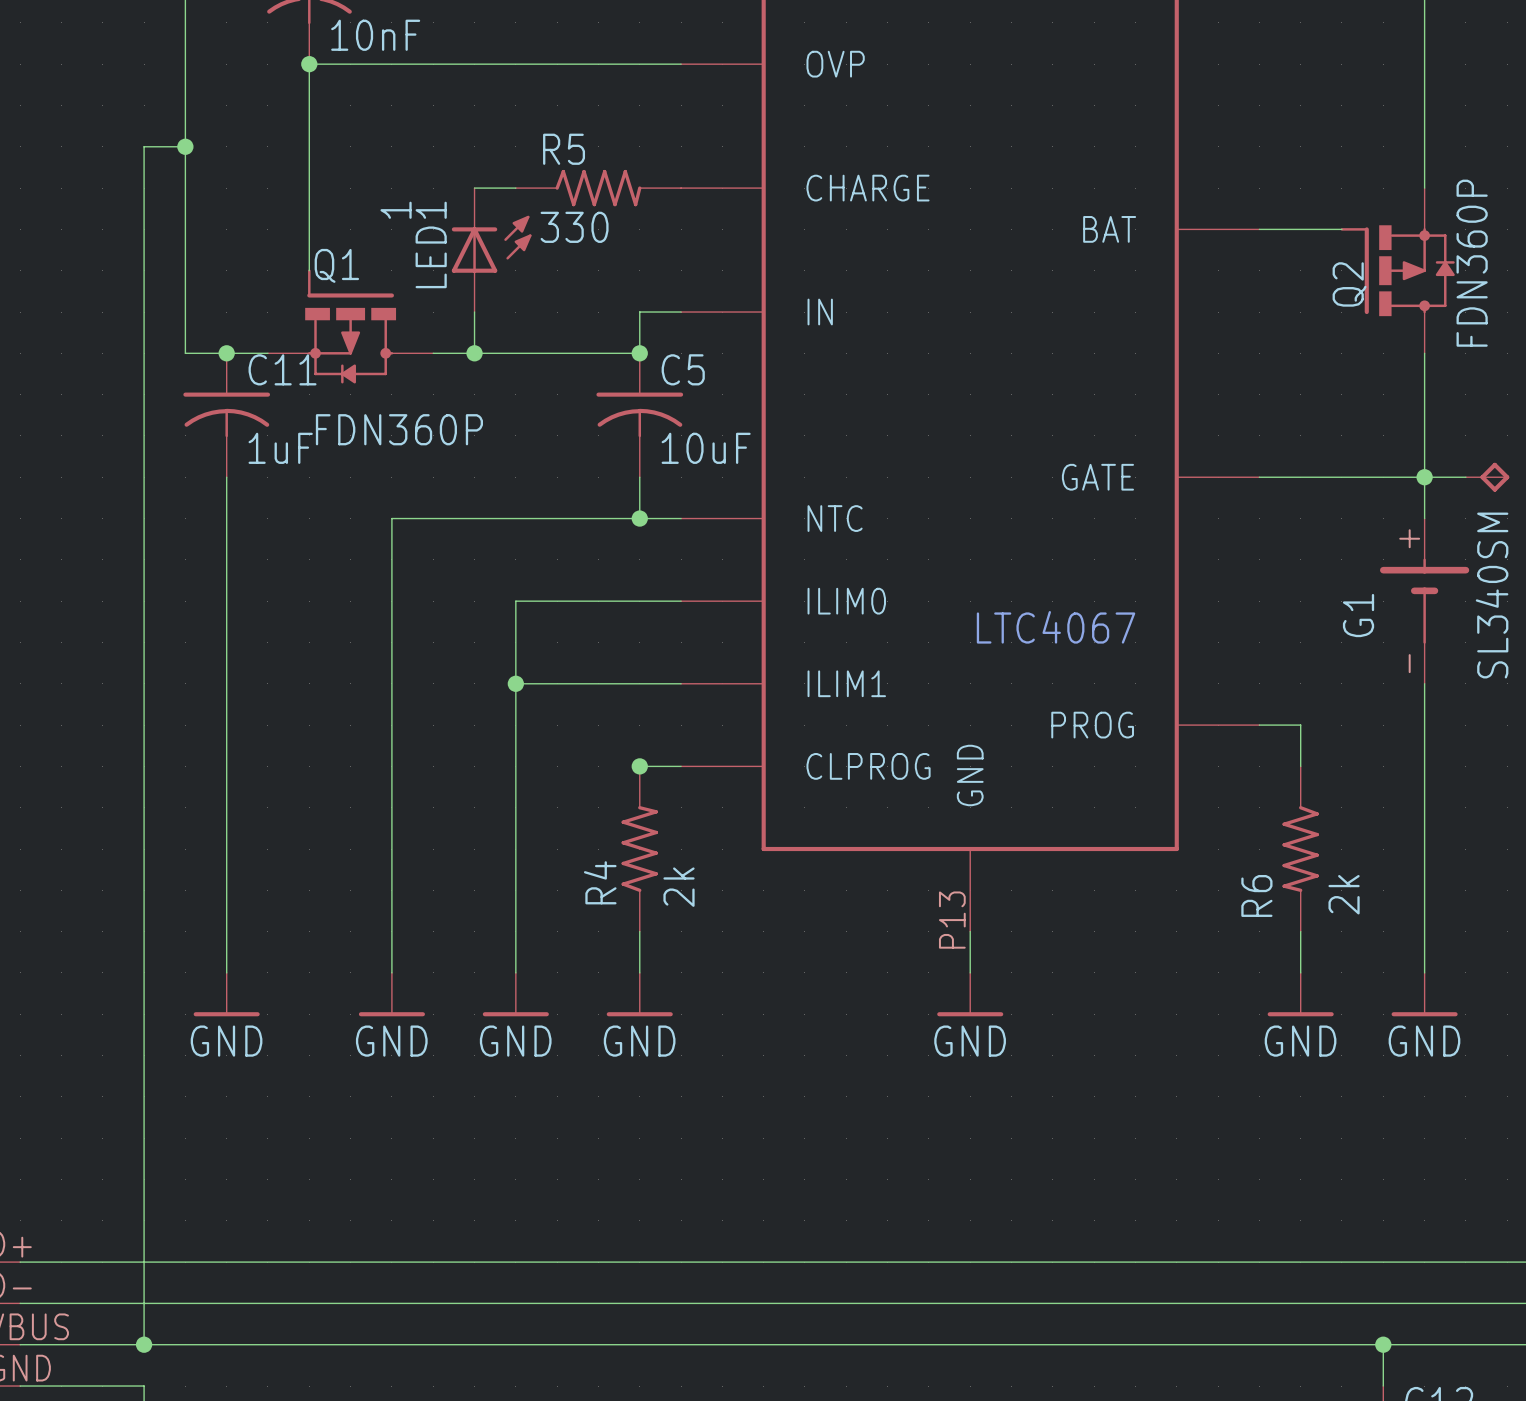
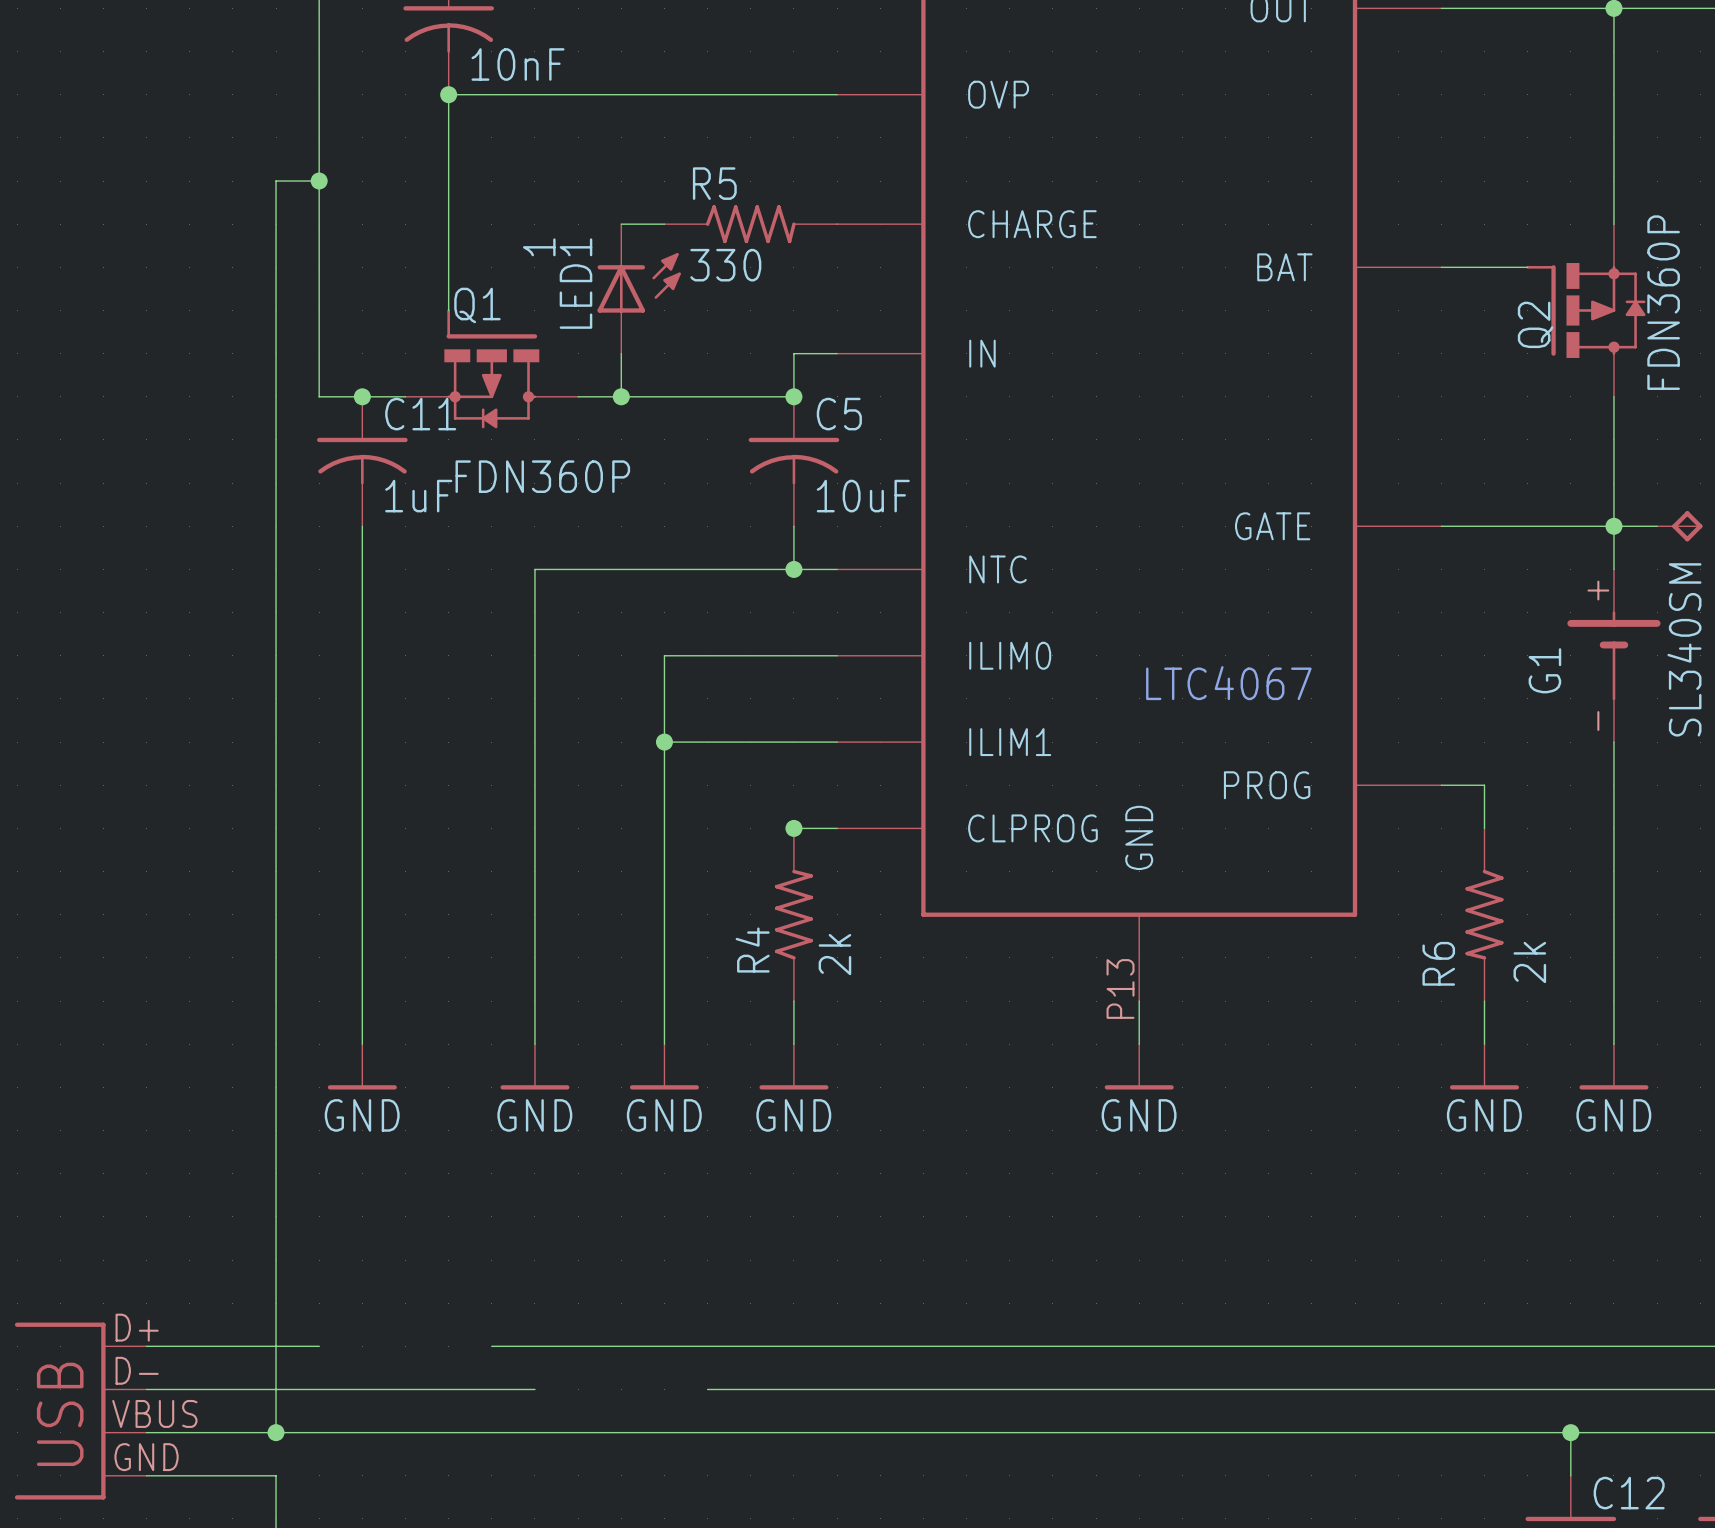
wire: (185, 1262) (350, 1262) -> none
wire: (391, 1303) (557, 1303) -> none

